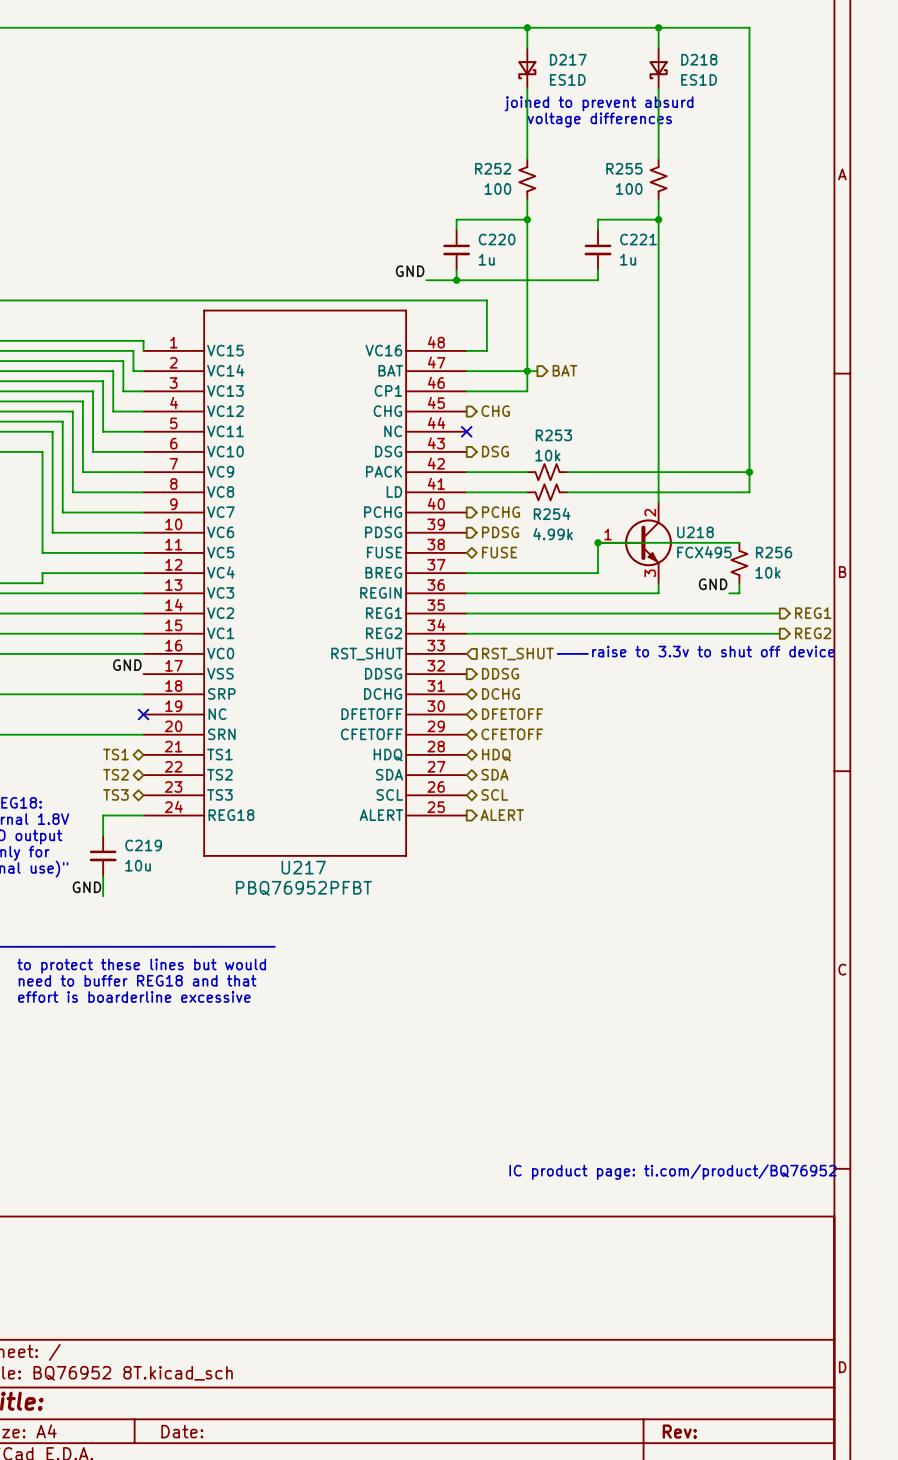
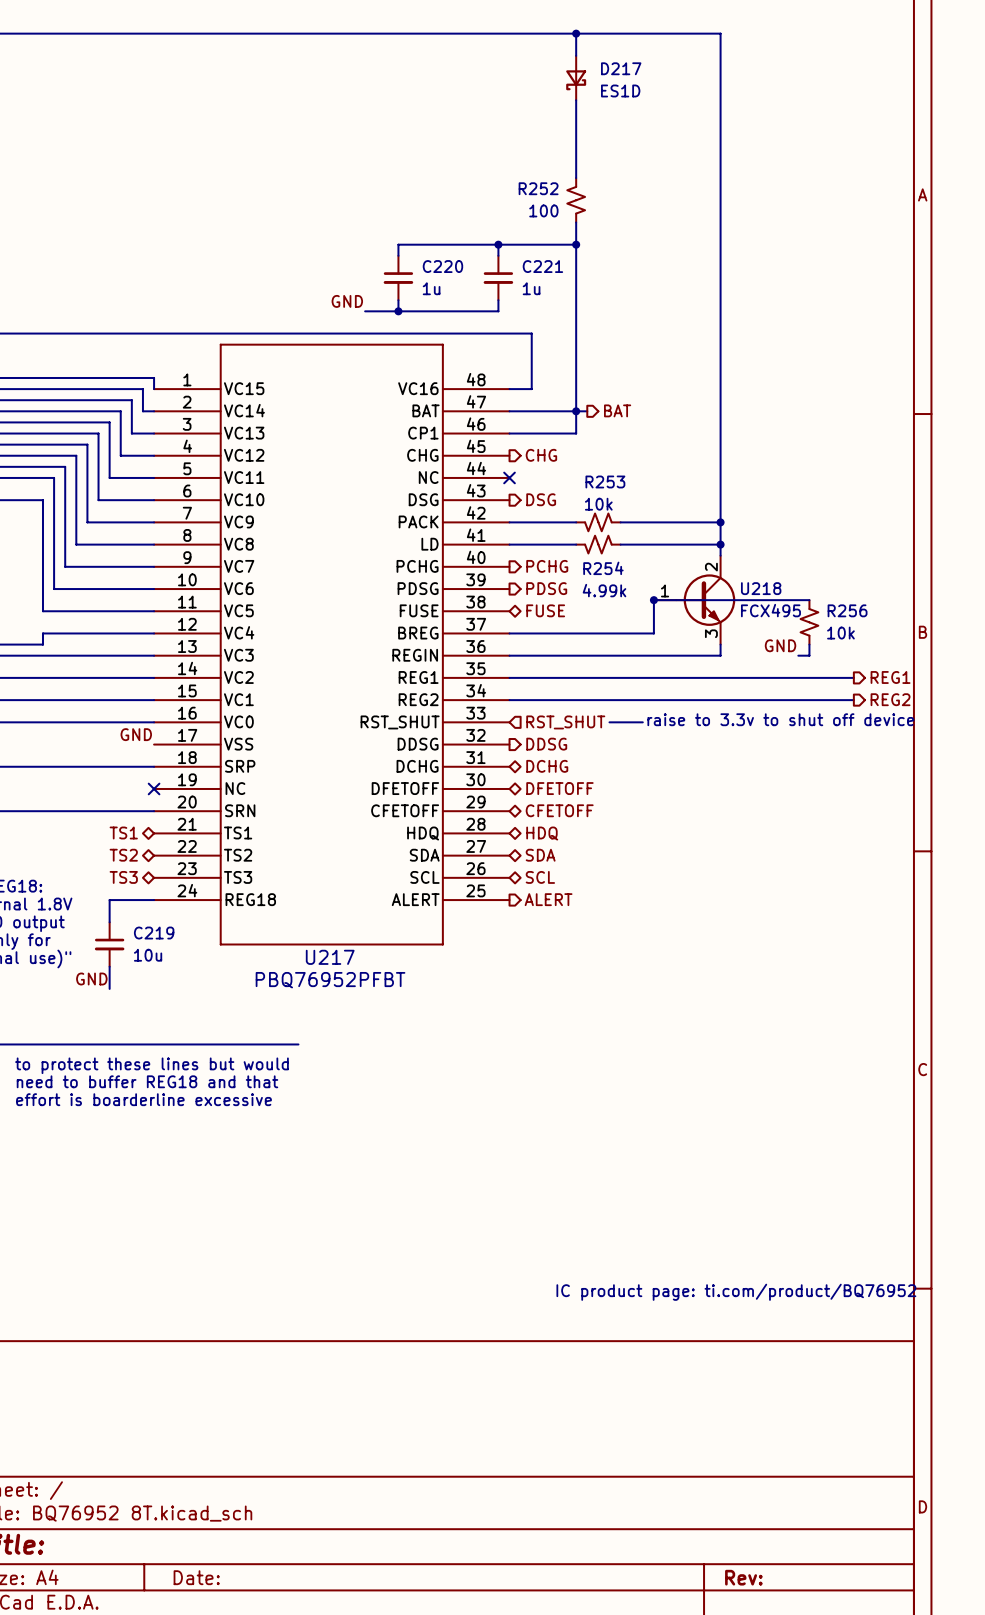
wire: (658, 27) (749, 27) (749, 492) (658, 492) -> none
junction: (658, 27) -> none
D218: ES1D (658, 68) -> none
text: joined to prevent absurd (599, 103) -> none
text: voltage differences (599, 120) -> none
R255: 100 (658, 179) -> none
wire: none -> (498, 244) (398, 244) (398, 255)
junction: none -> (498, 244)
wire: (658, 219) (598, 219) (598, 229) -> none
junction: (658, 219) -> none
C220 name: C220 (497, 239) -> C221 (542, 266)
C220: none -> 1u (398, 278)
C221: 1u (598, 249) -> none
wire: none -> (398, 300) (398, 311)
wire: (598, 270) (598, 280) (456, 280) -> none
label position: GND (410, 271) -> GND (347, 301)
wire: none -> (365, 311) (465, 311)
junction: none -> (398, 311)
junction: (456, 280) -> none
wire: (658, 472) (749, 472) -> none
junction: none -> (720, 522)
junction: (749, 472) -> none
junction: none -> (720, 544)

